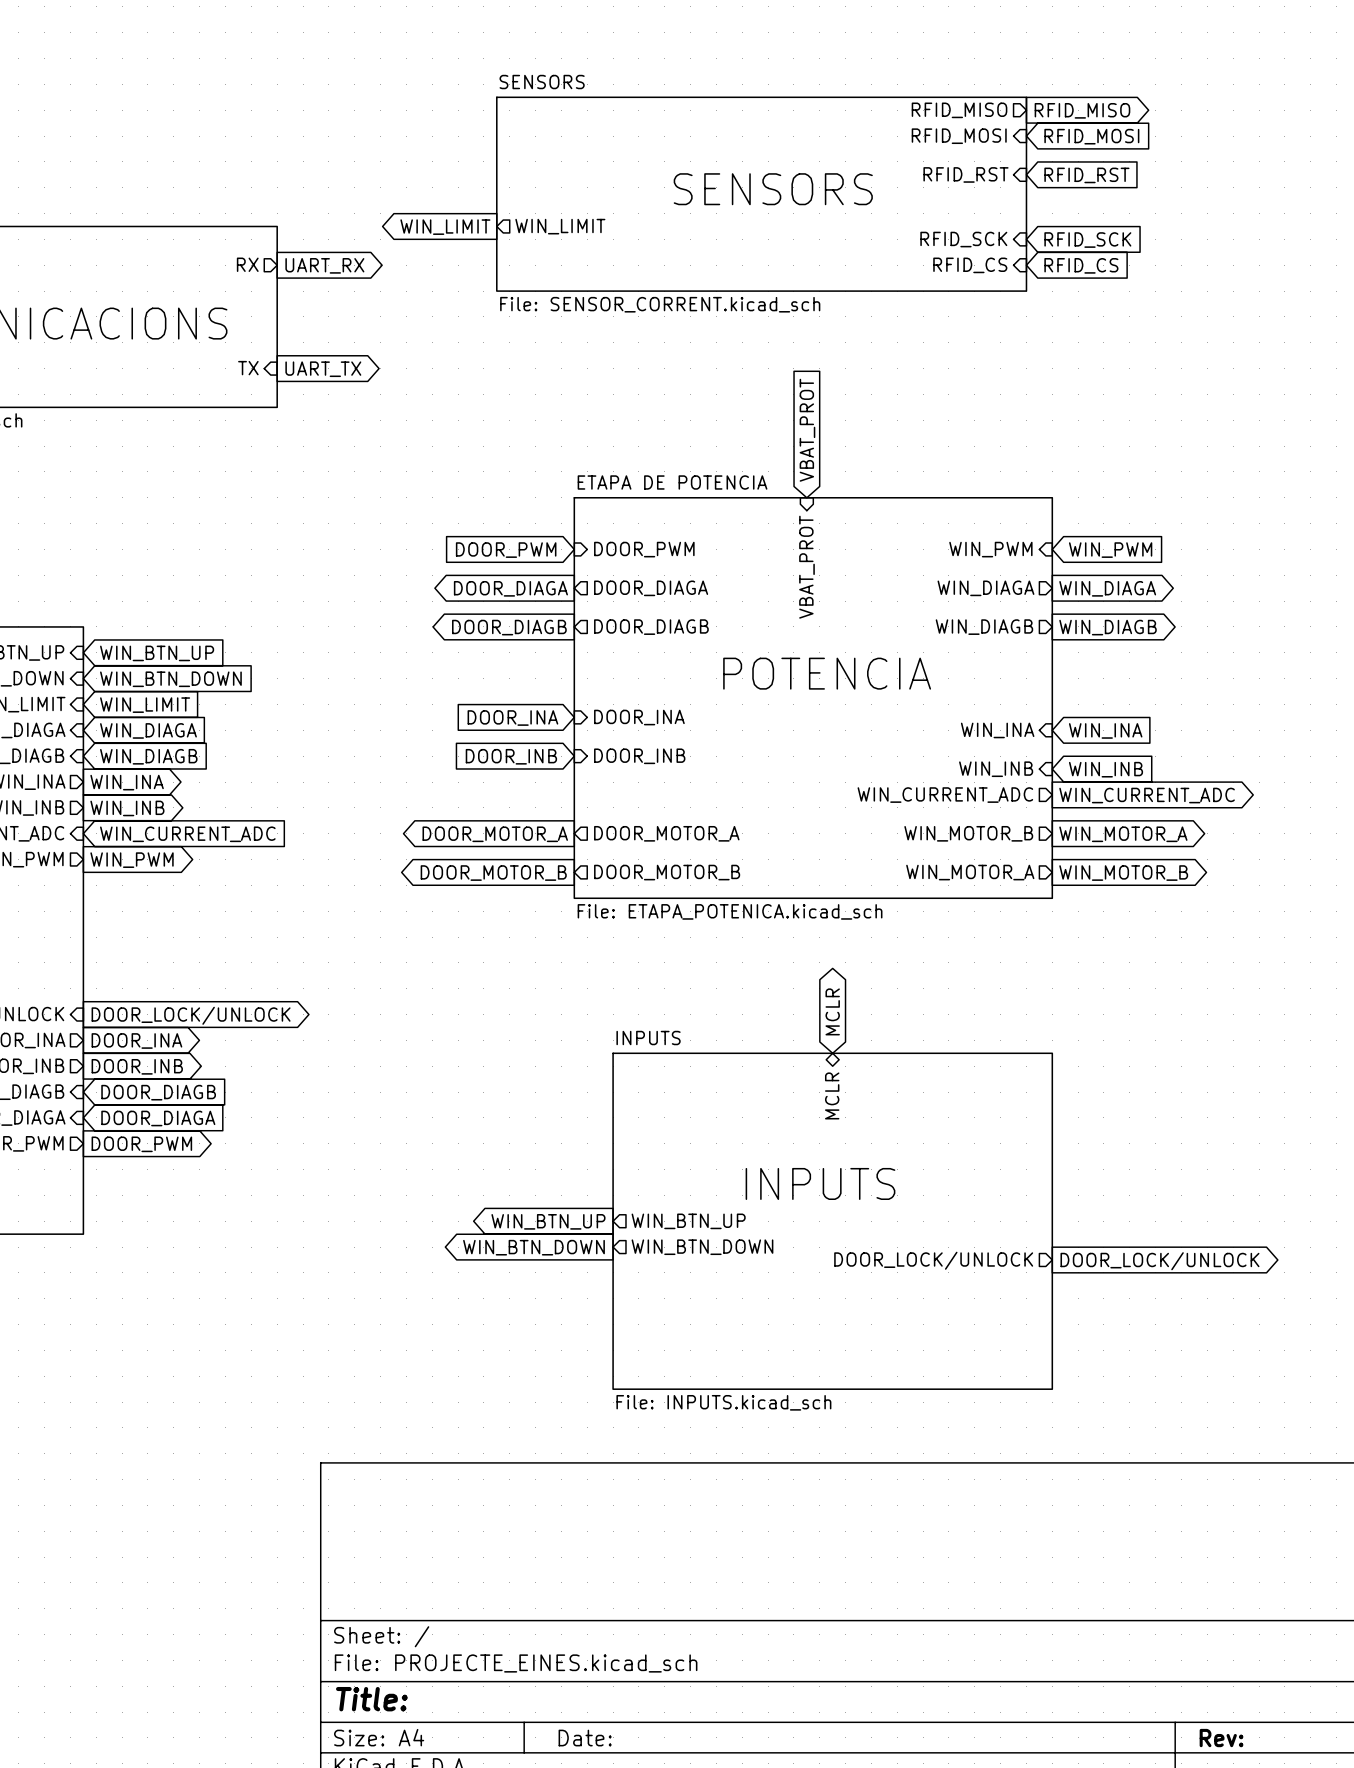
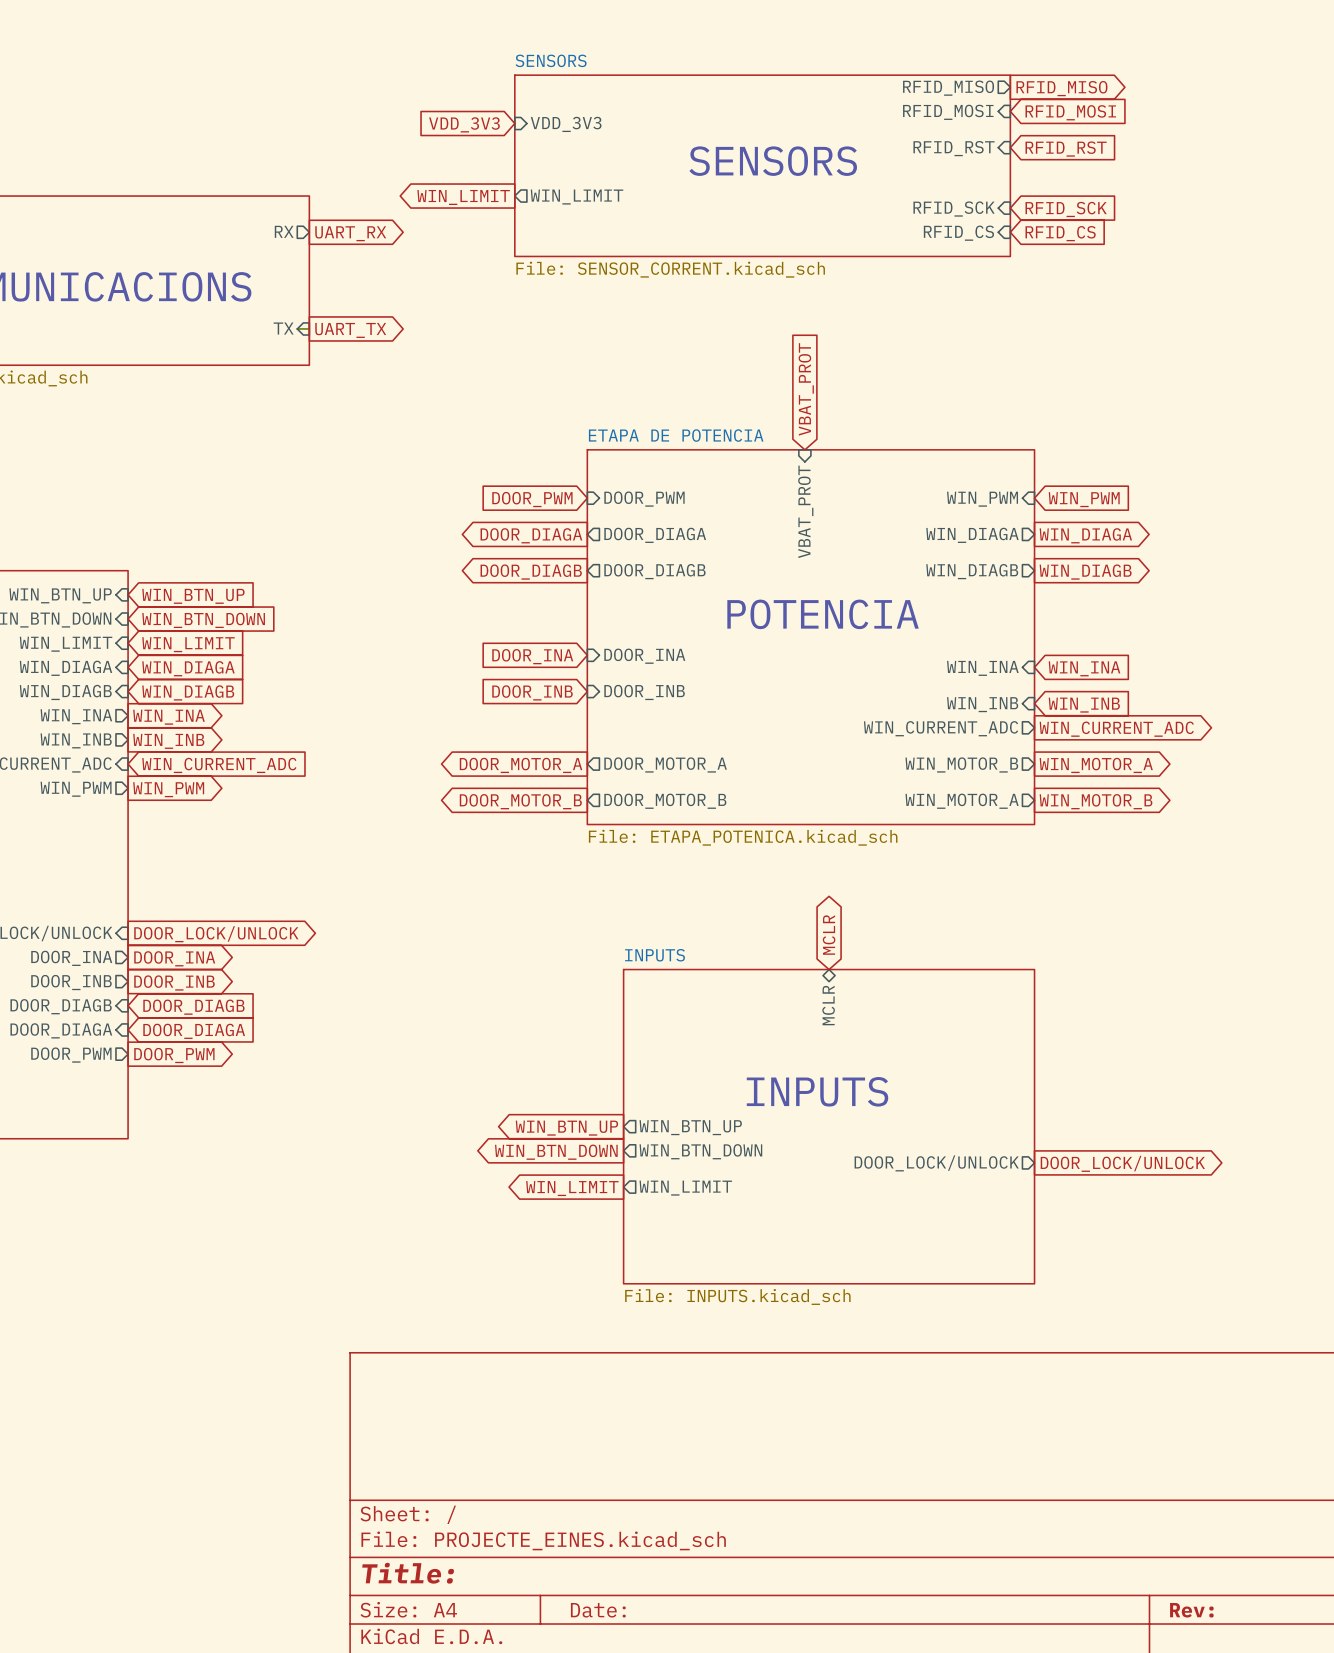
global label: none -> VDD_3V3 (464, 124)
sheet pin: none -> VDD_3V3 (566, 124)
wire: none -> (297, 328) (309, 328)
sheet pin: none -> WIN_LIMIT (685, 1188)
global label: none -> WIN_LIMIT (572, 1188)

